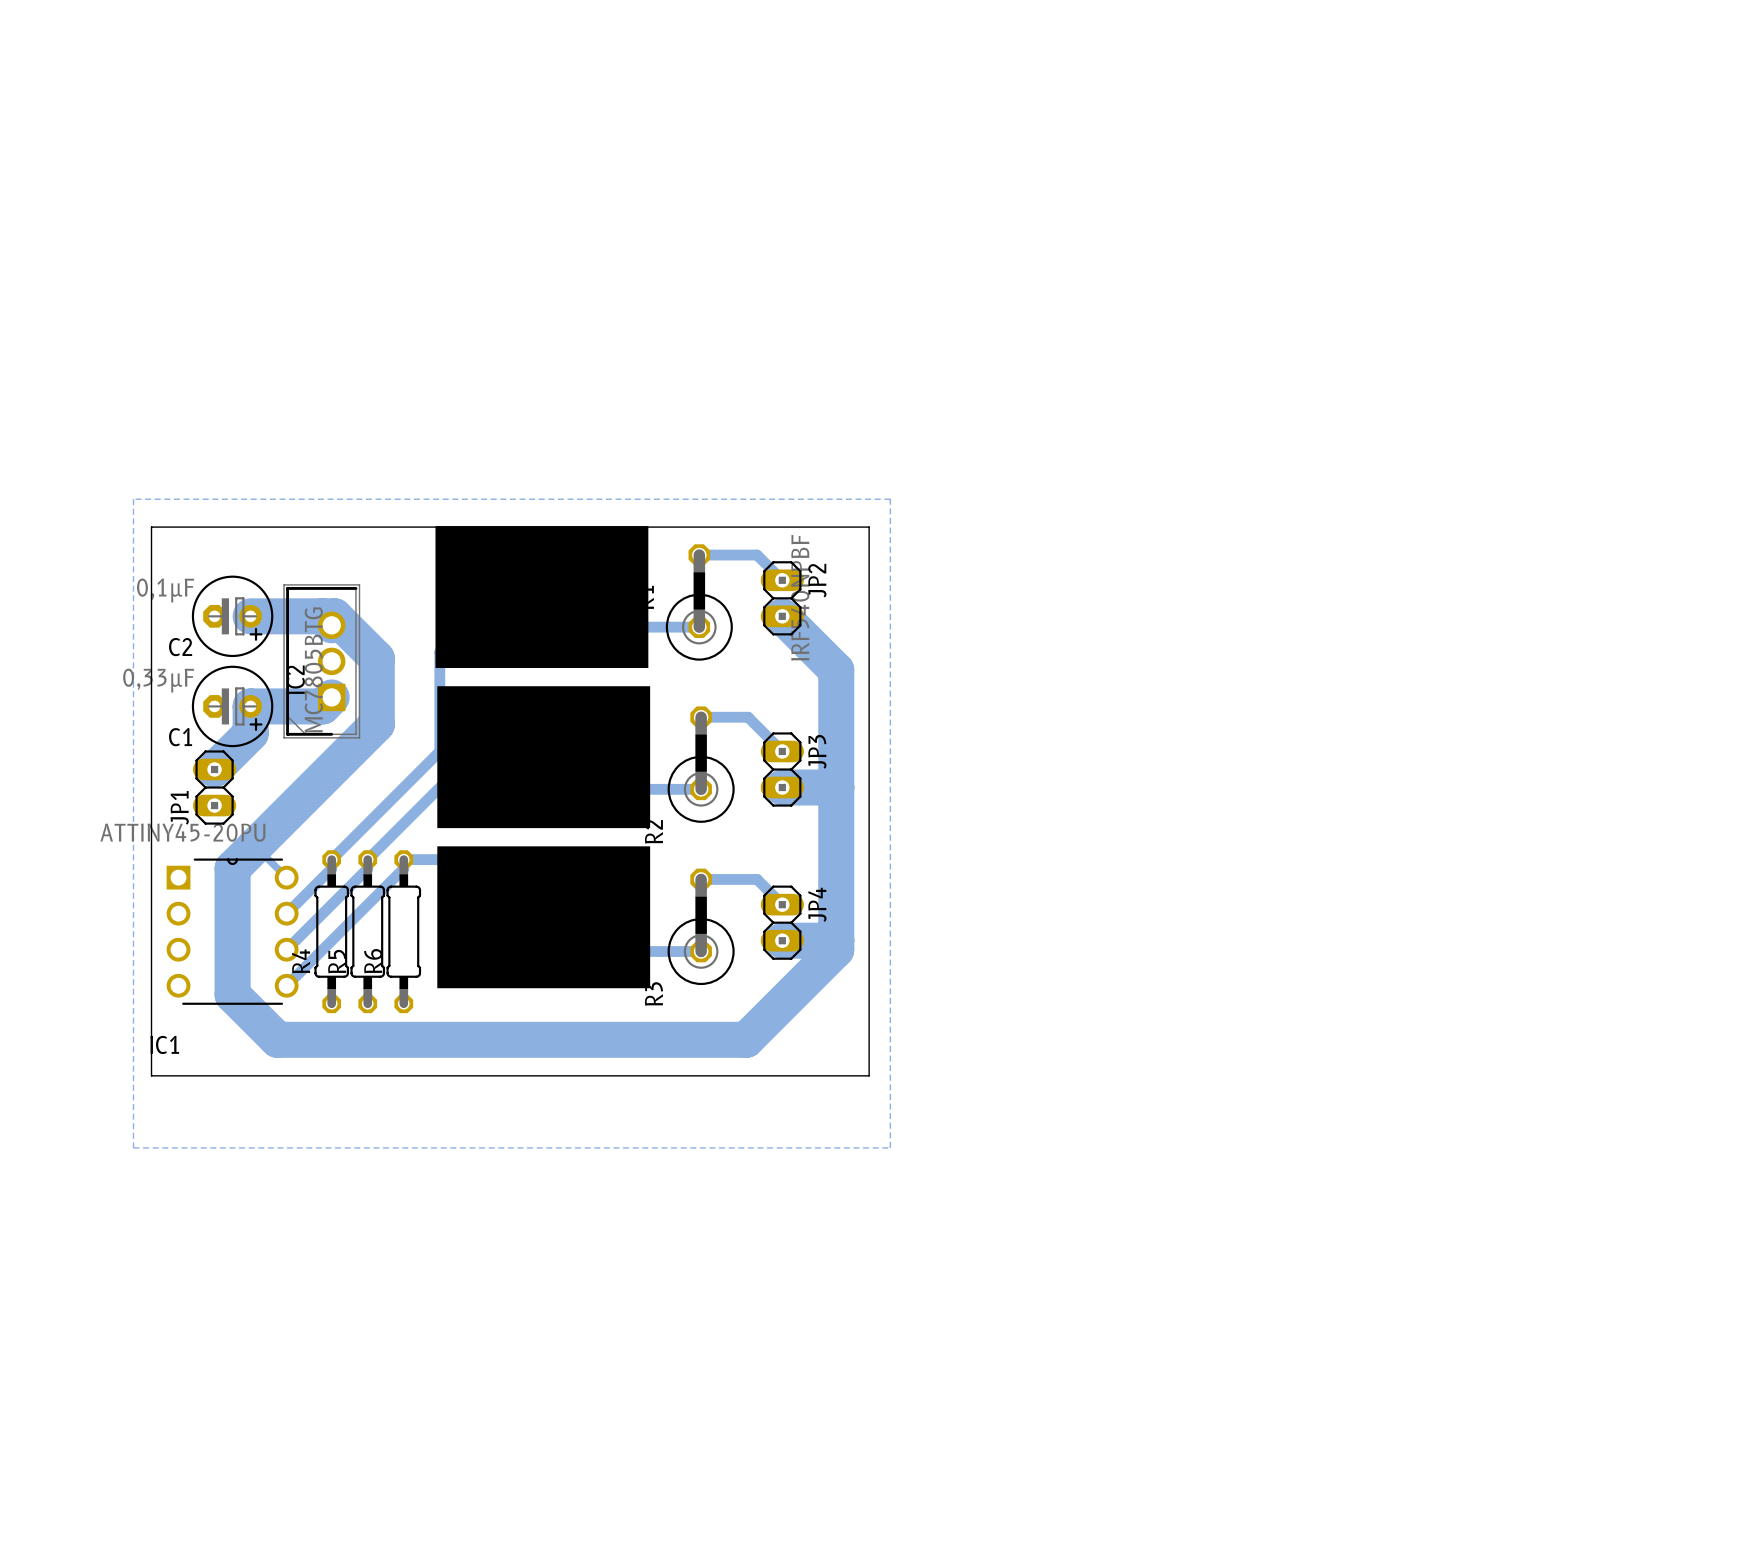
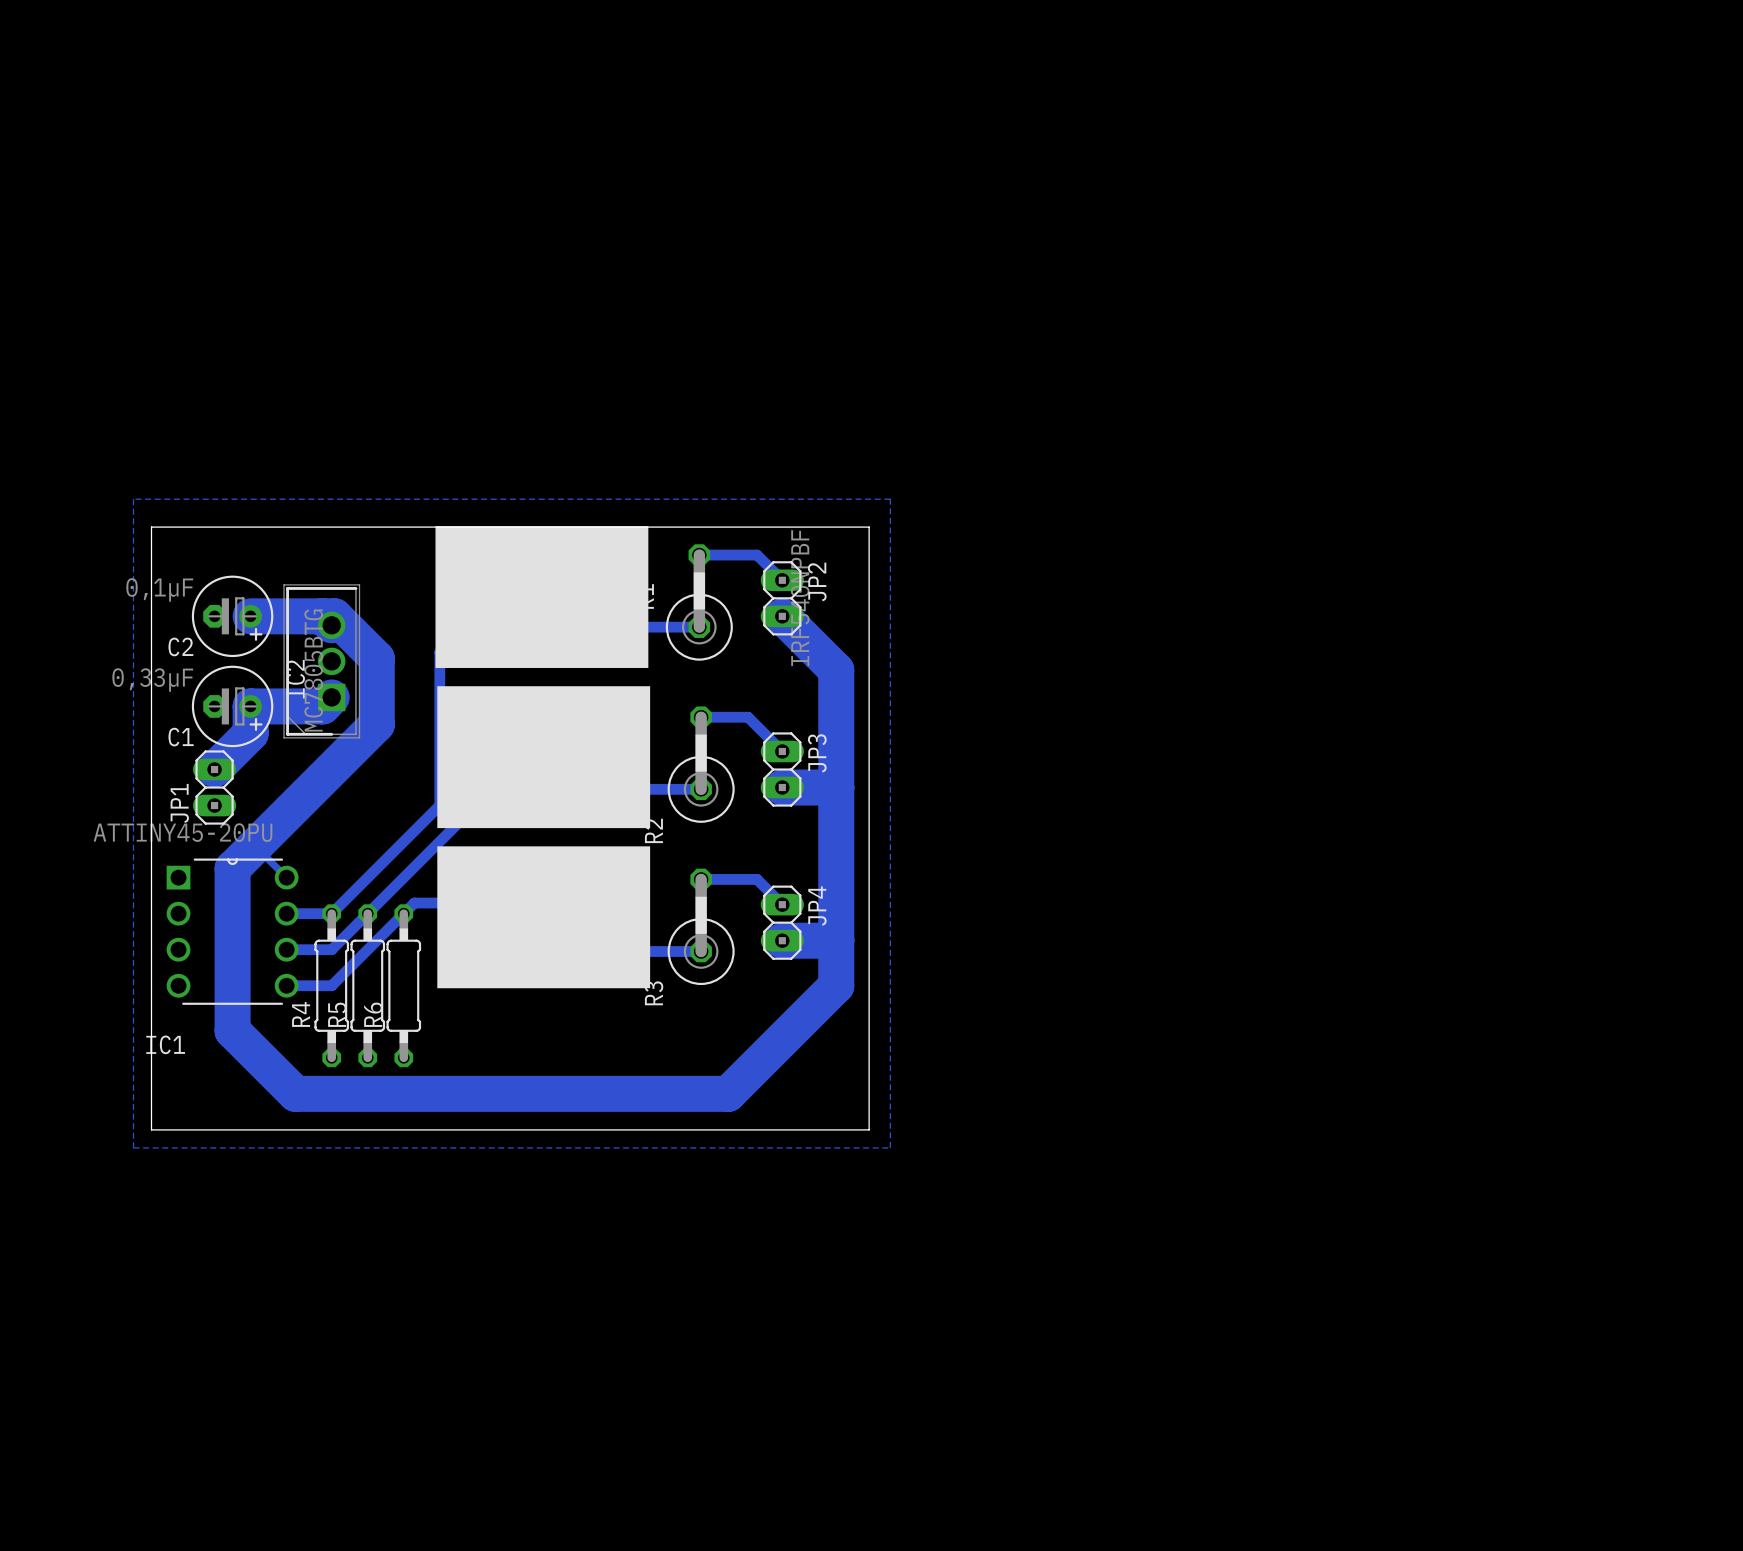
bottom track: (506, 742) (484, 742) (367, 859) (367, 868) (286, 949) -> (506, 742) (506, 774) (331, 949) (286, 949)
bottom track: (439, 751) (331, 859) (331, 868) (286, 913) -> (439, 751) (439, 805) (331, 913) (286, 913)
bottom track: (510, 903) (466, 859) (403, 859) (403, 868) (286, 985) -> (510, 903) (414, 903) (331, 985) (286, 985)
R4 position: (331, 931) -> (331, 985)
R5 position: (367, 931) -> (367, 985)
R6 position: (403, 931) -> (403, 985)
bottom track: (836, 949) (746, 1039) (277, 1039) (232, 994) -> (836, 949) (836, 985) (728, 1093) (295, 1093) (232, 1030) (232, 994)
board edge: (151, 1075) (869, 1075) -> (151, 1075) (151, 1129) (869, 1129) (869, 1075)

